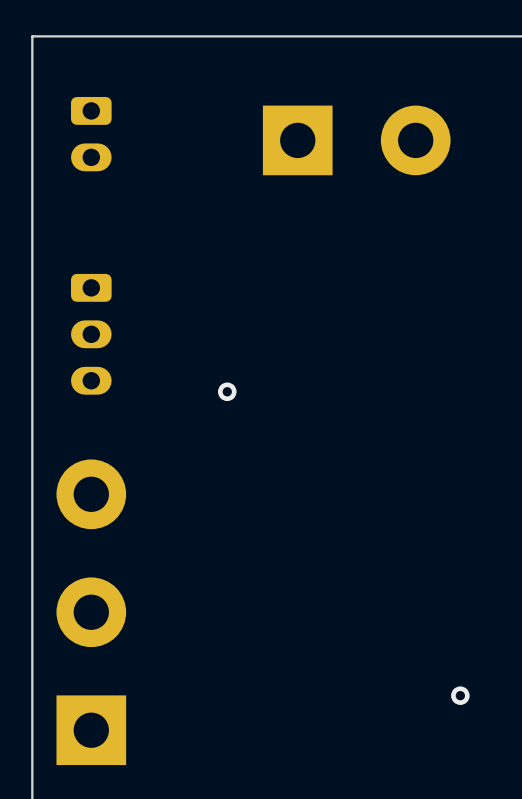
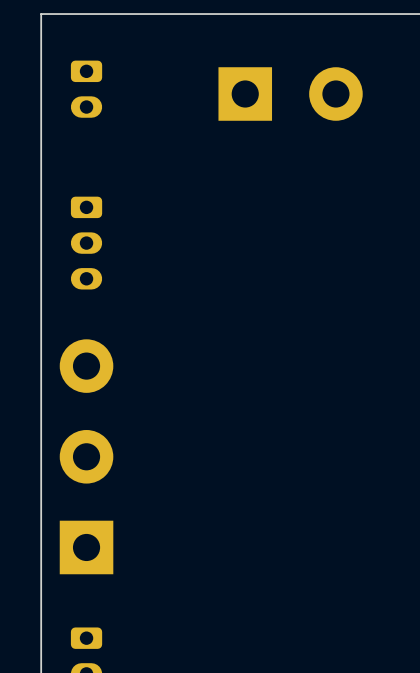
via: (227, 391) -> none
via: (460, 695) -> none

